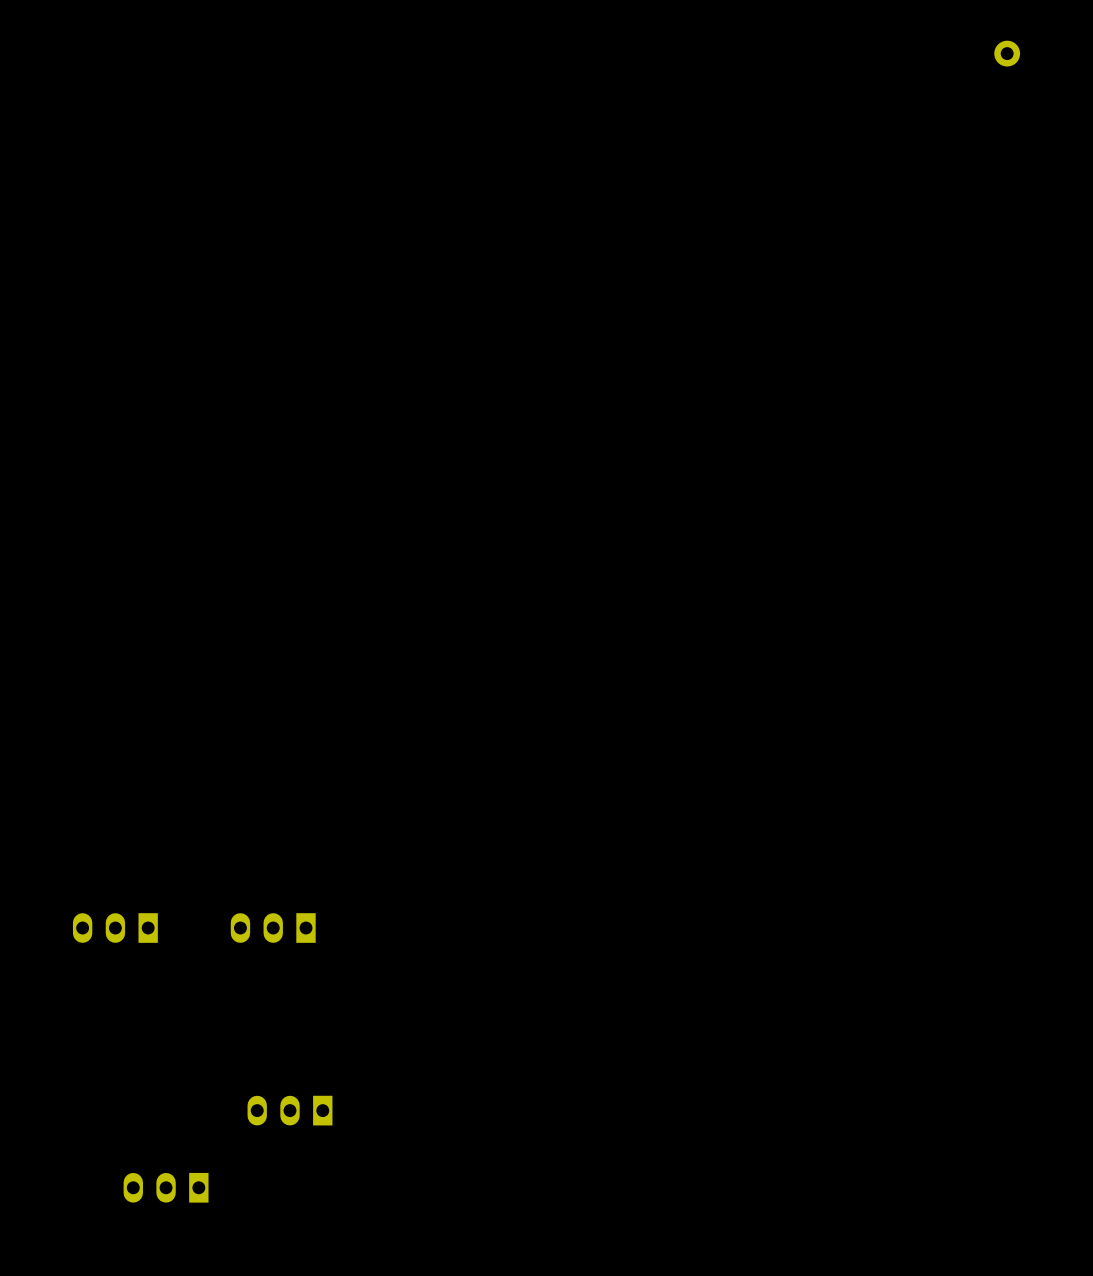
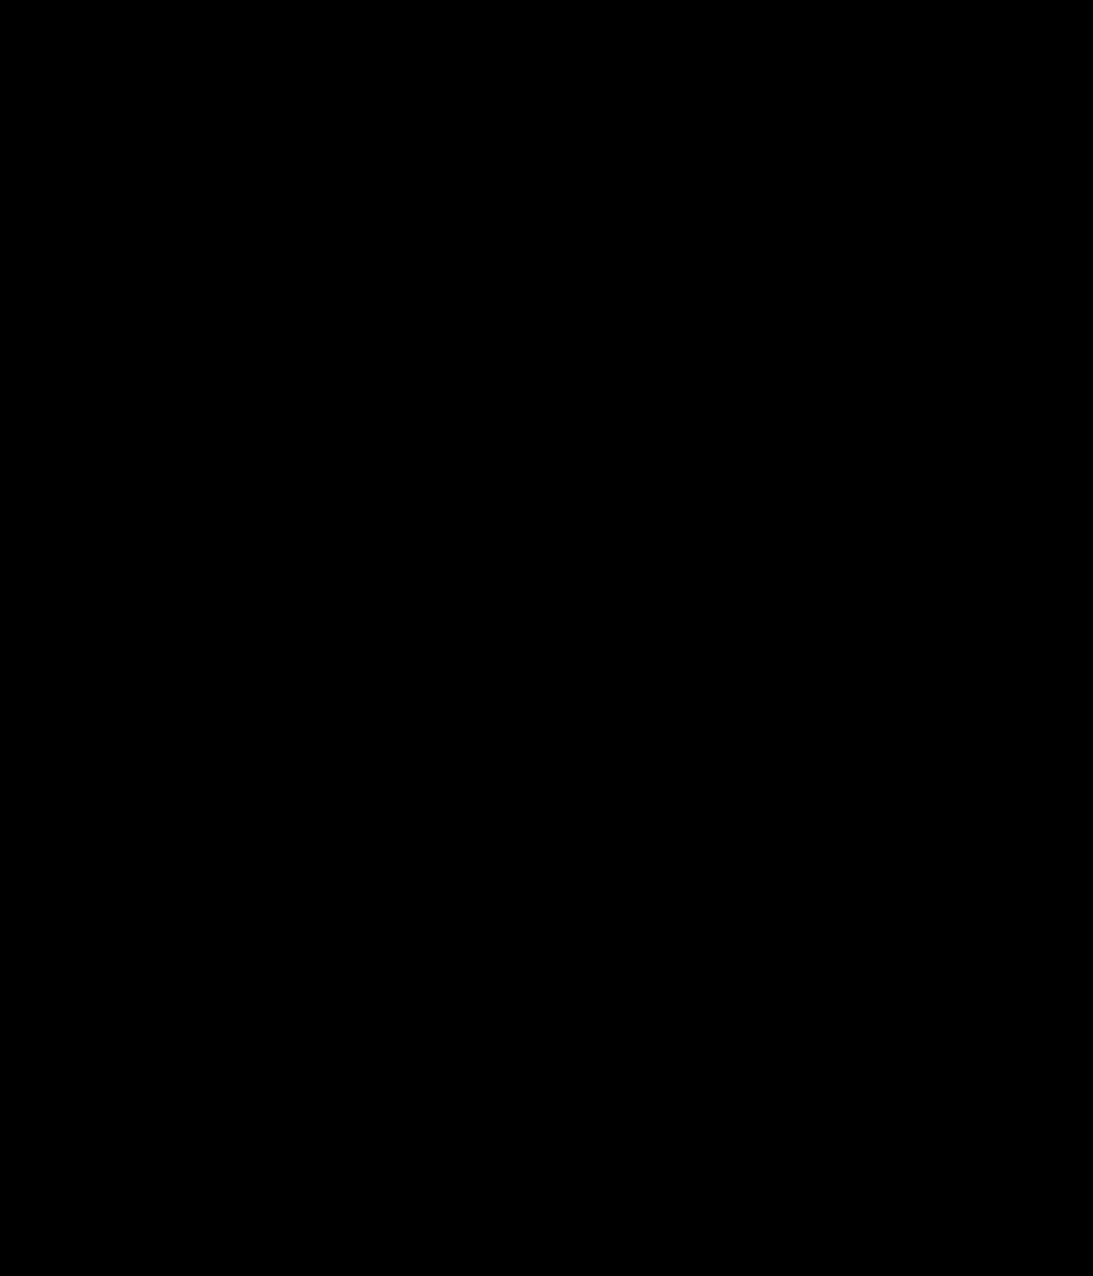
part: (1007, 53) -> none
part: (115, 928) -> none
part: (273, 928) -> none
part: (289, 1110) -> none
part: (166, 1187) -> none

